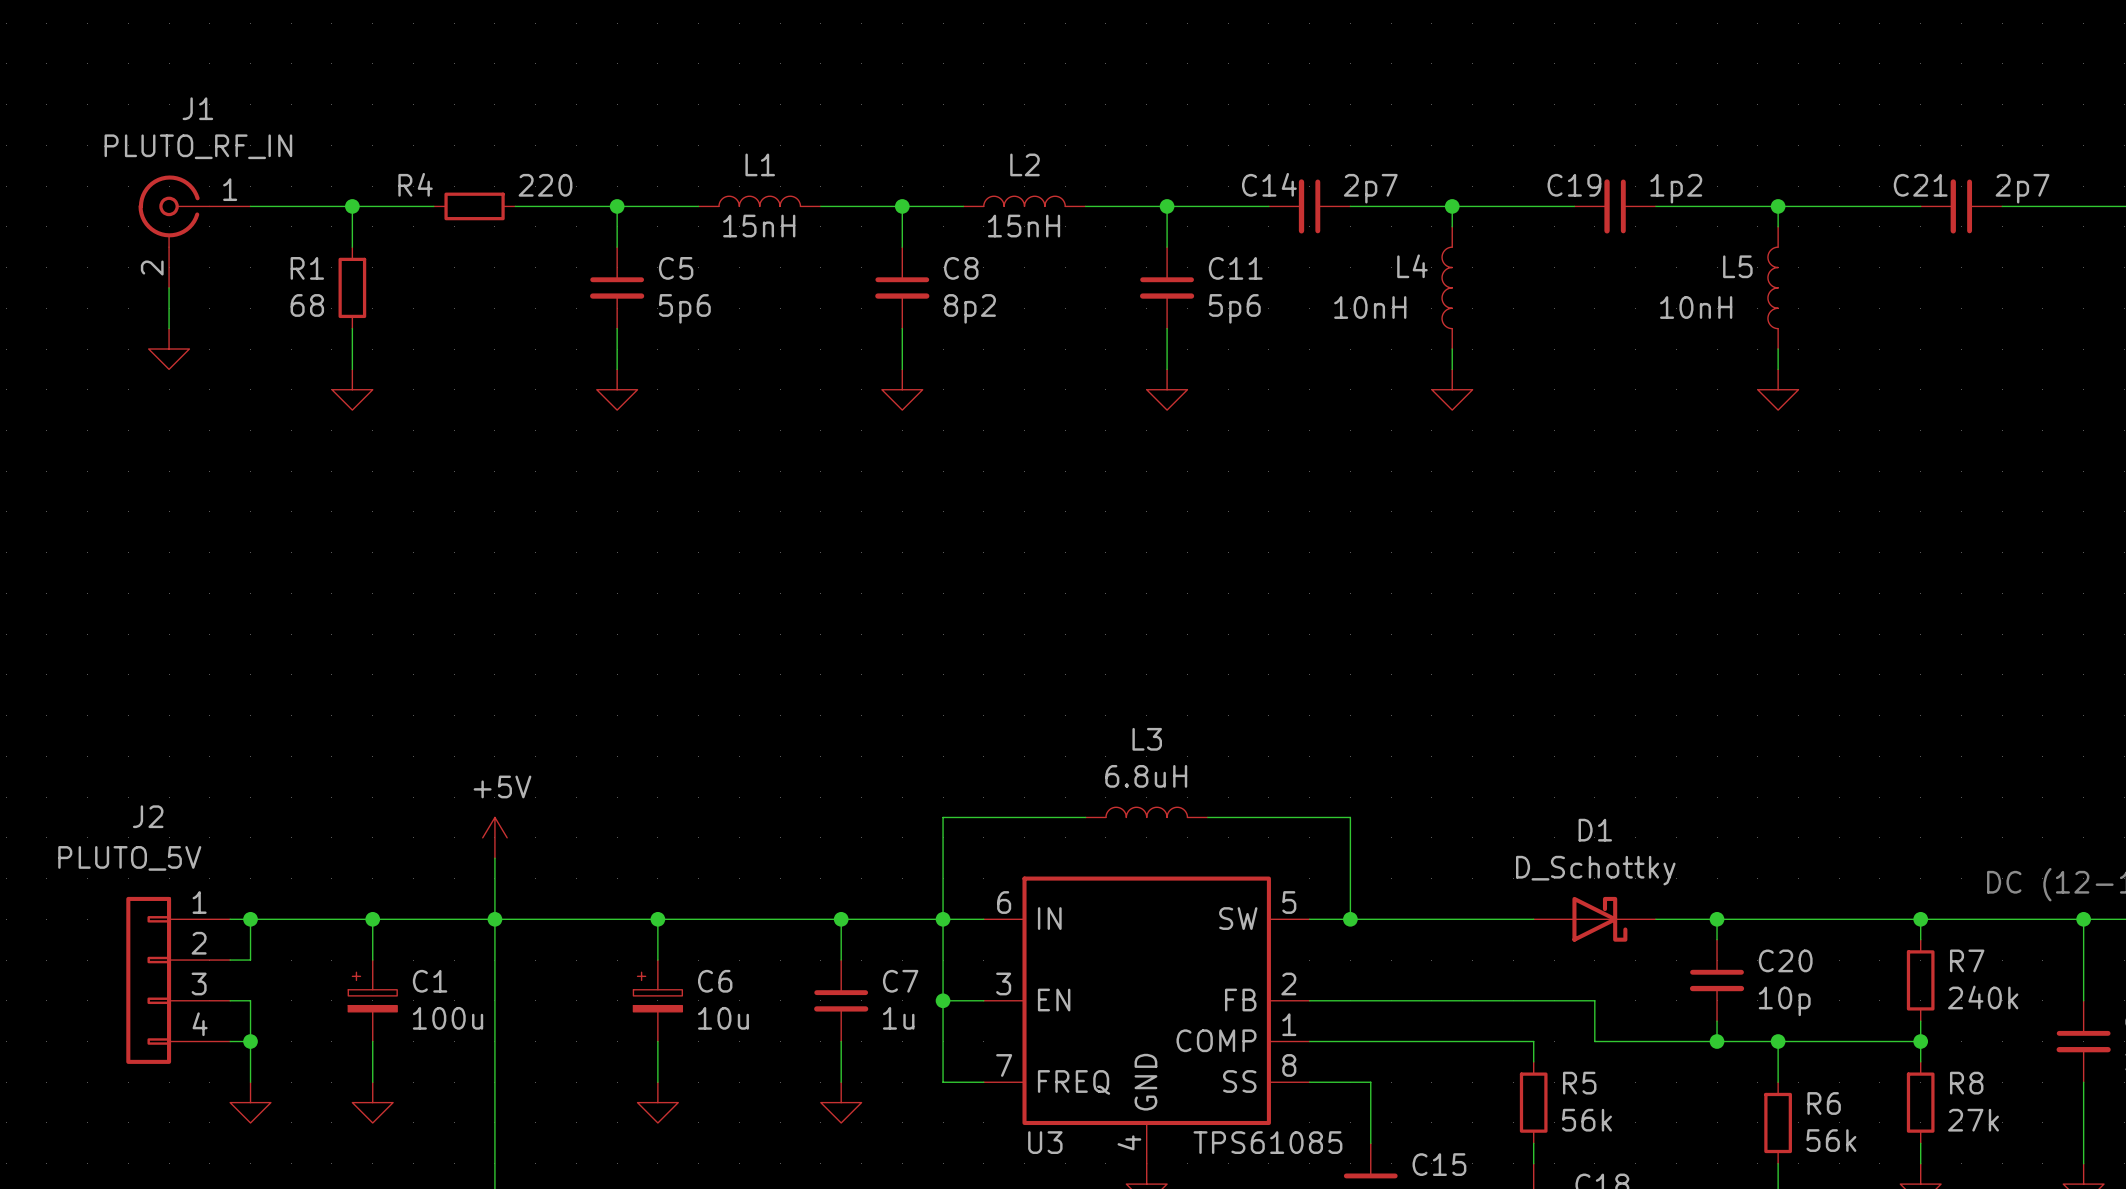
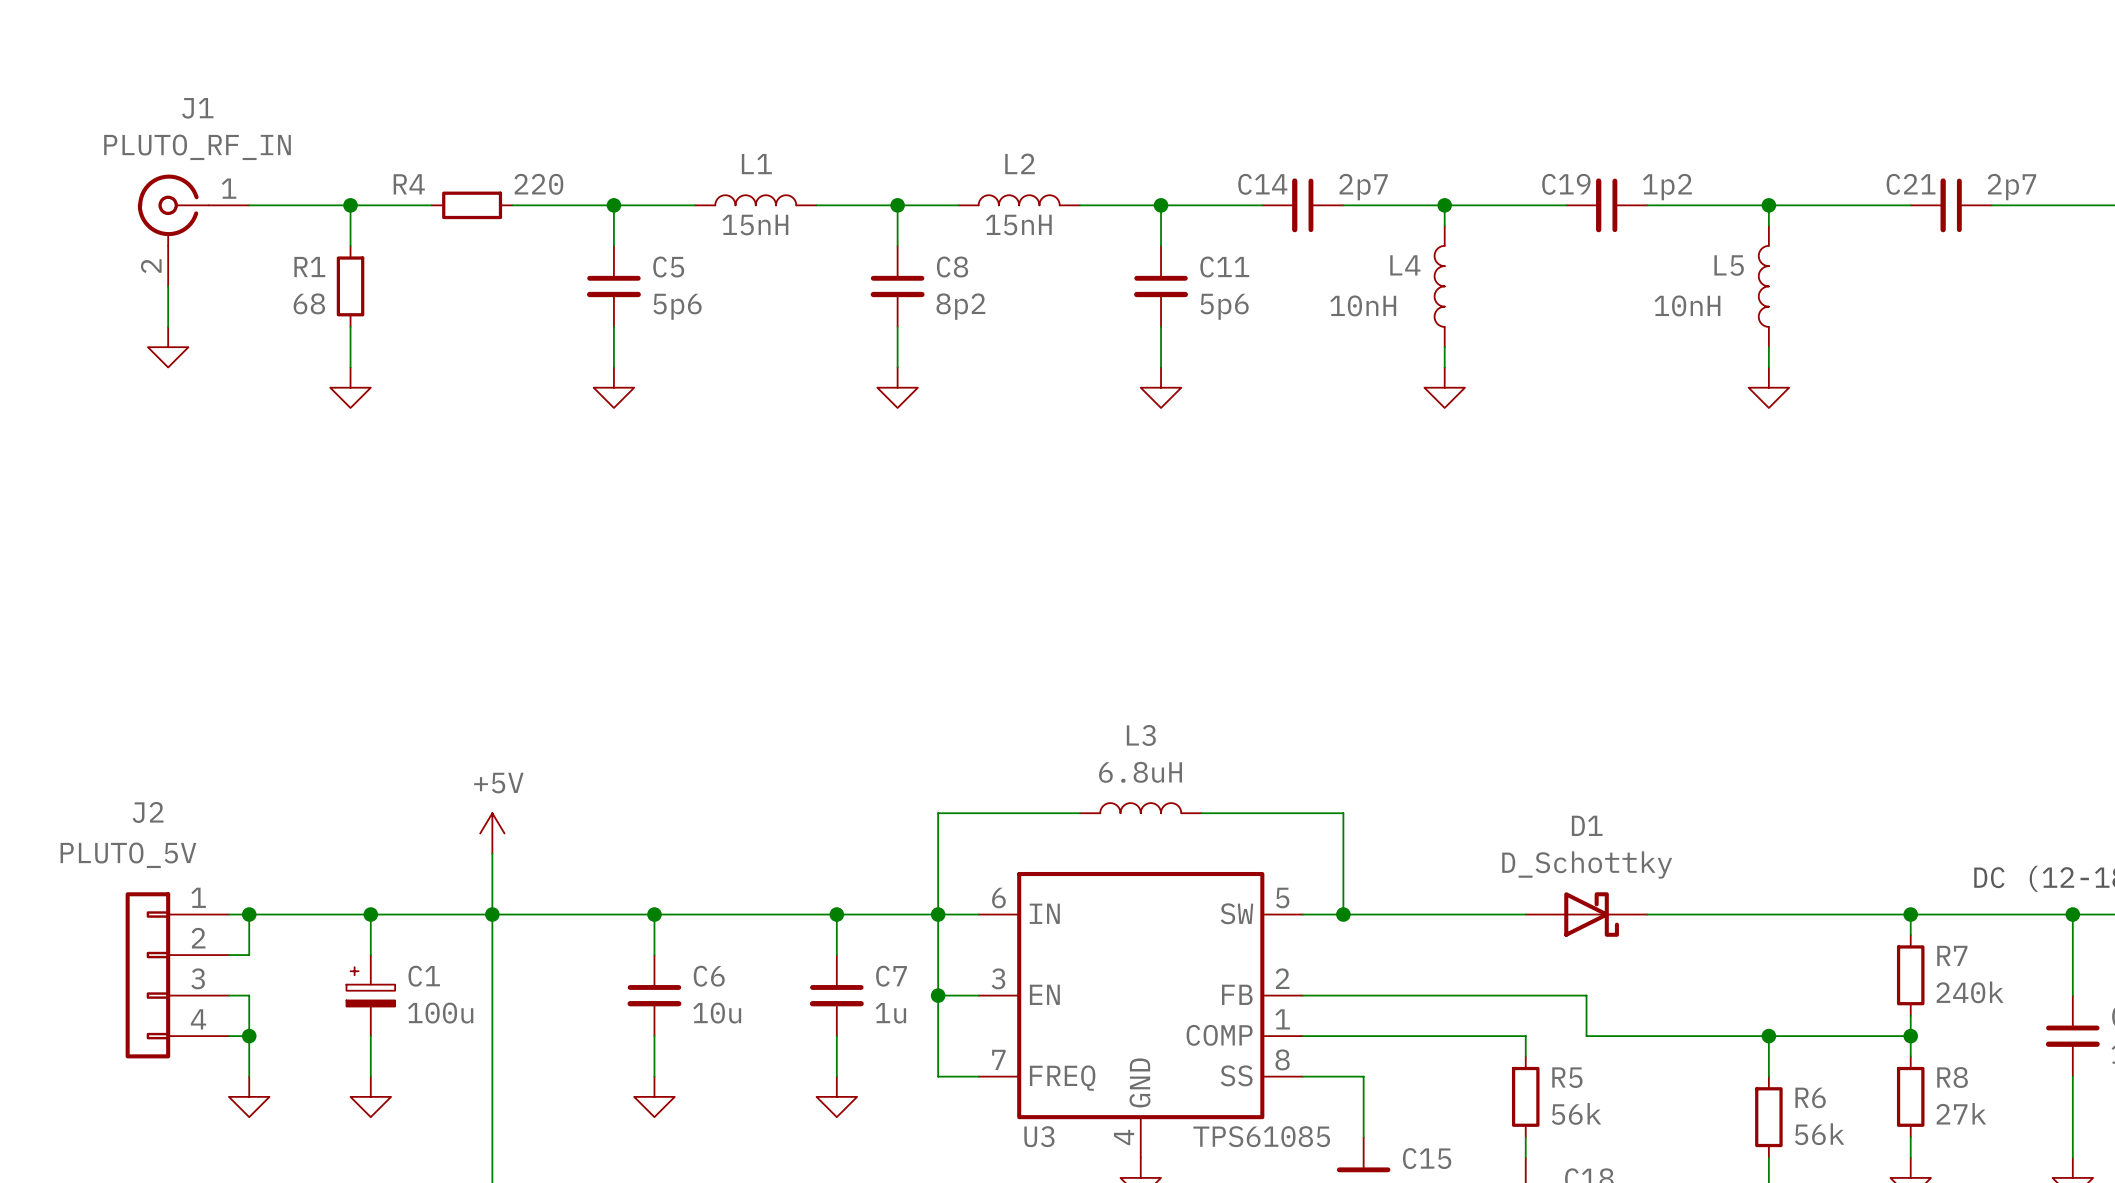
wire: (1717, 919) (1717, 939) -> none
junction: (1717, 919) -> none
C6 symbol: [633, 960, 683, 1042] -> [627, 955, 682, 1037]
C20: 10p (1717, 980) -> none
wire: (1717, 1021) (1717, 1041) -> none
junction: (1717, 1041) -> none

